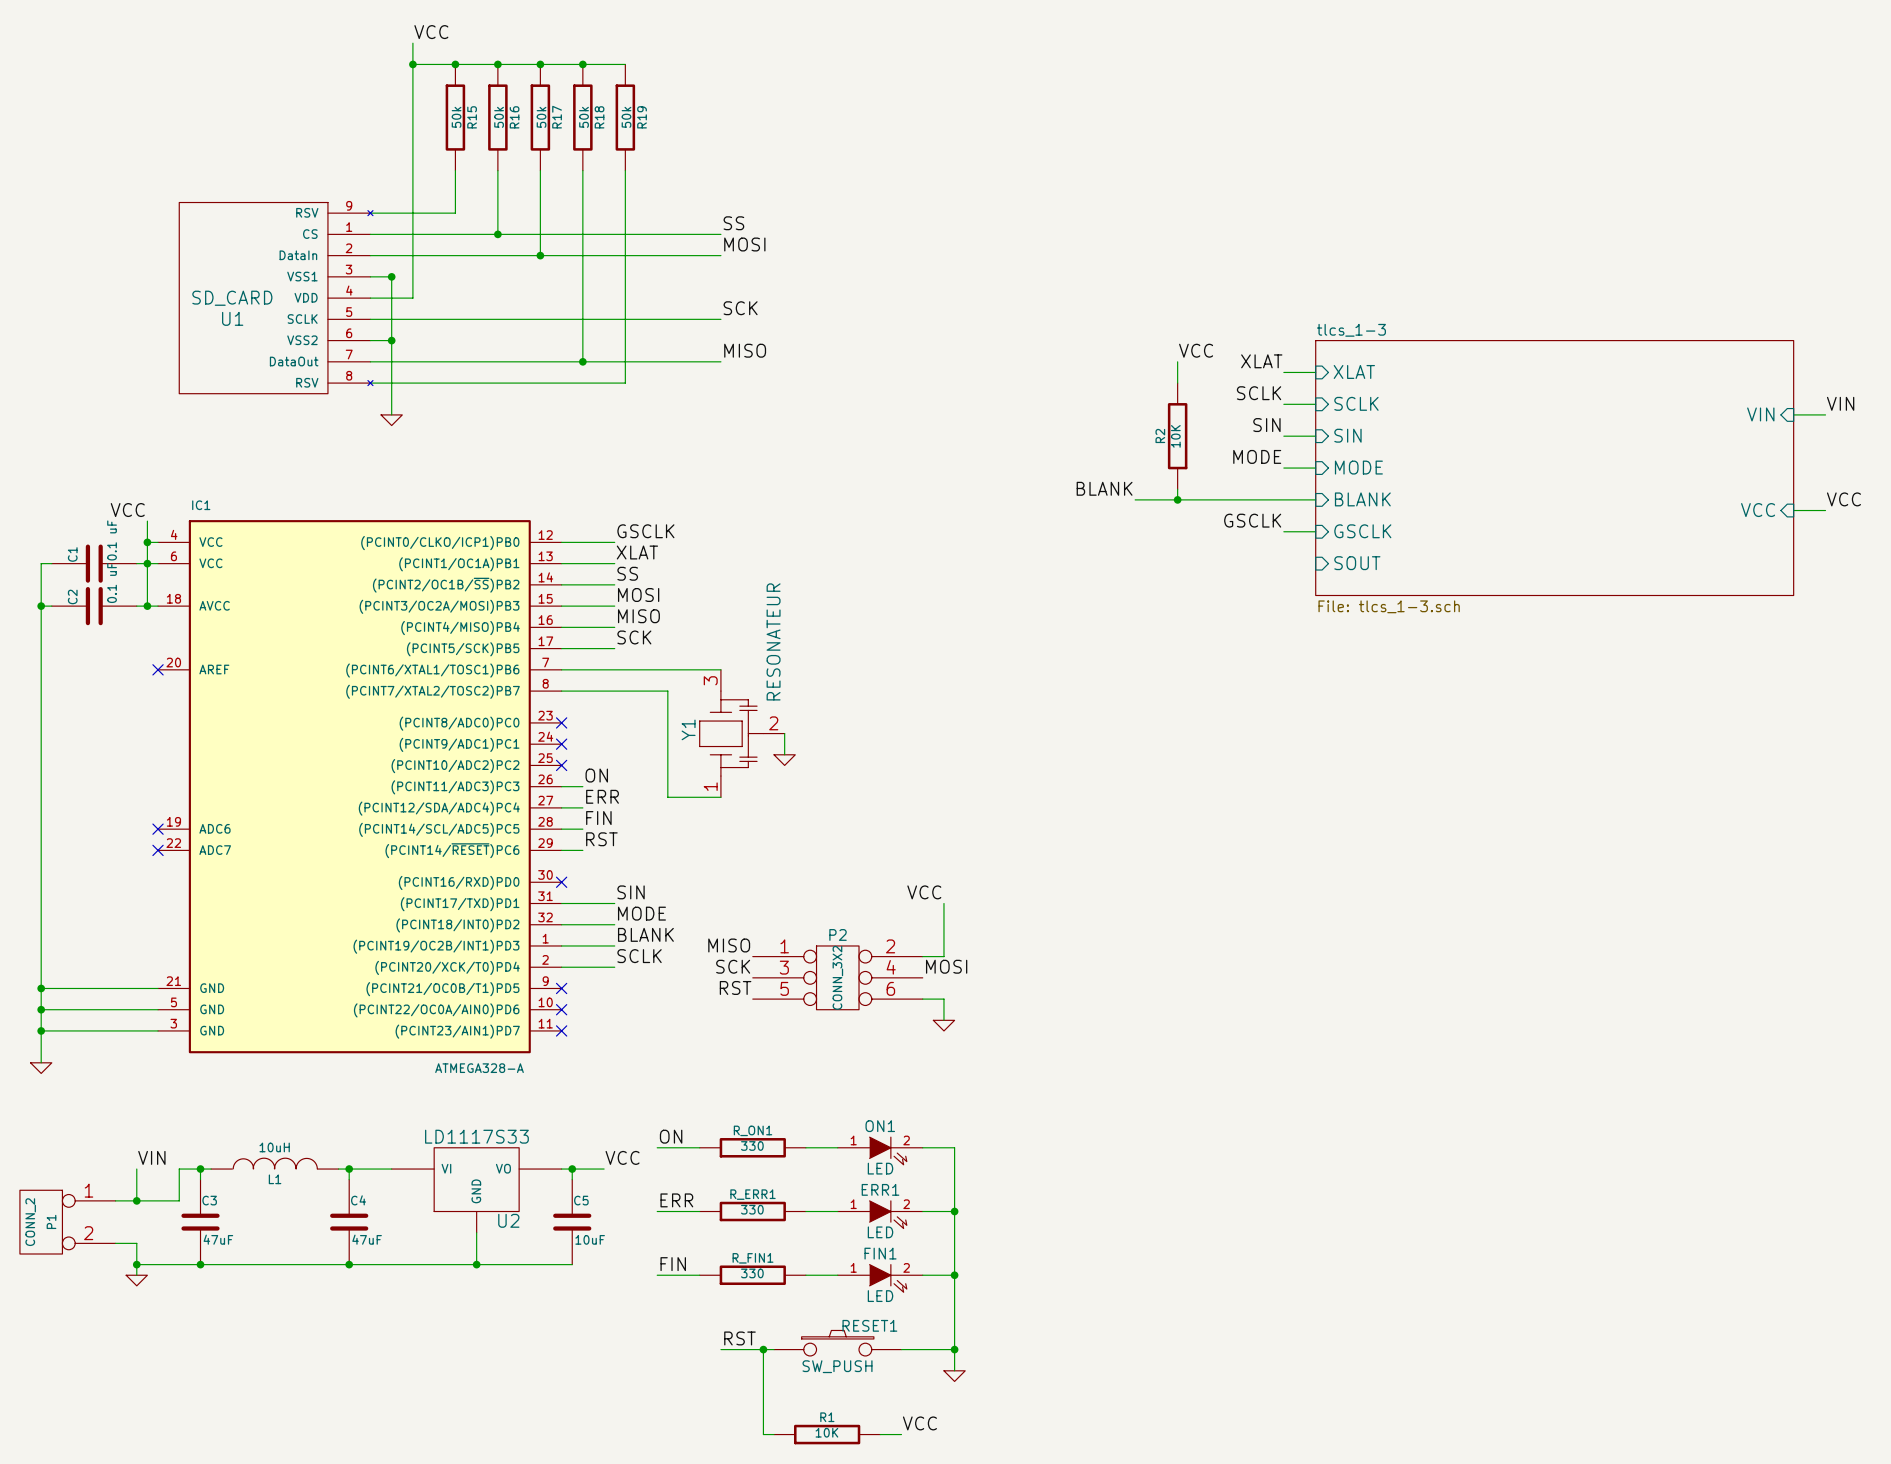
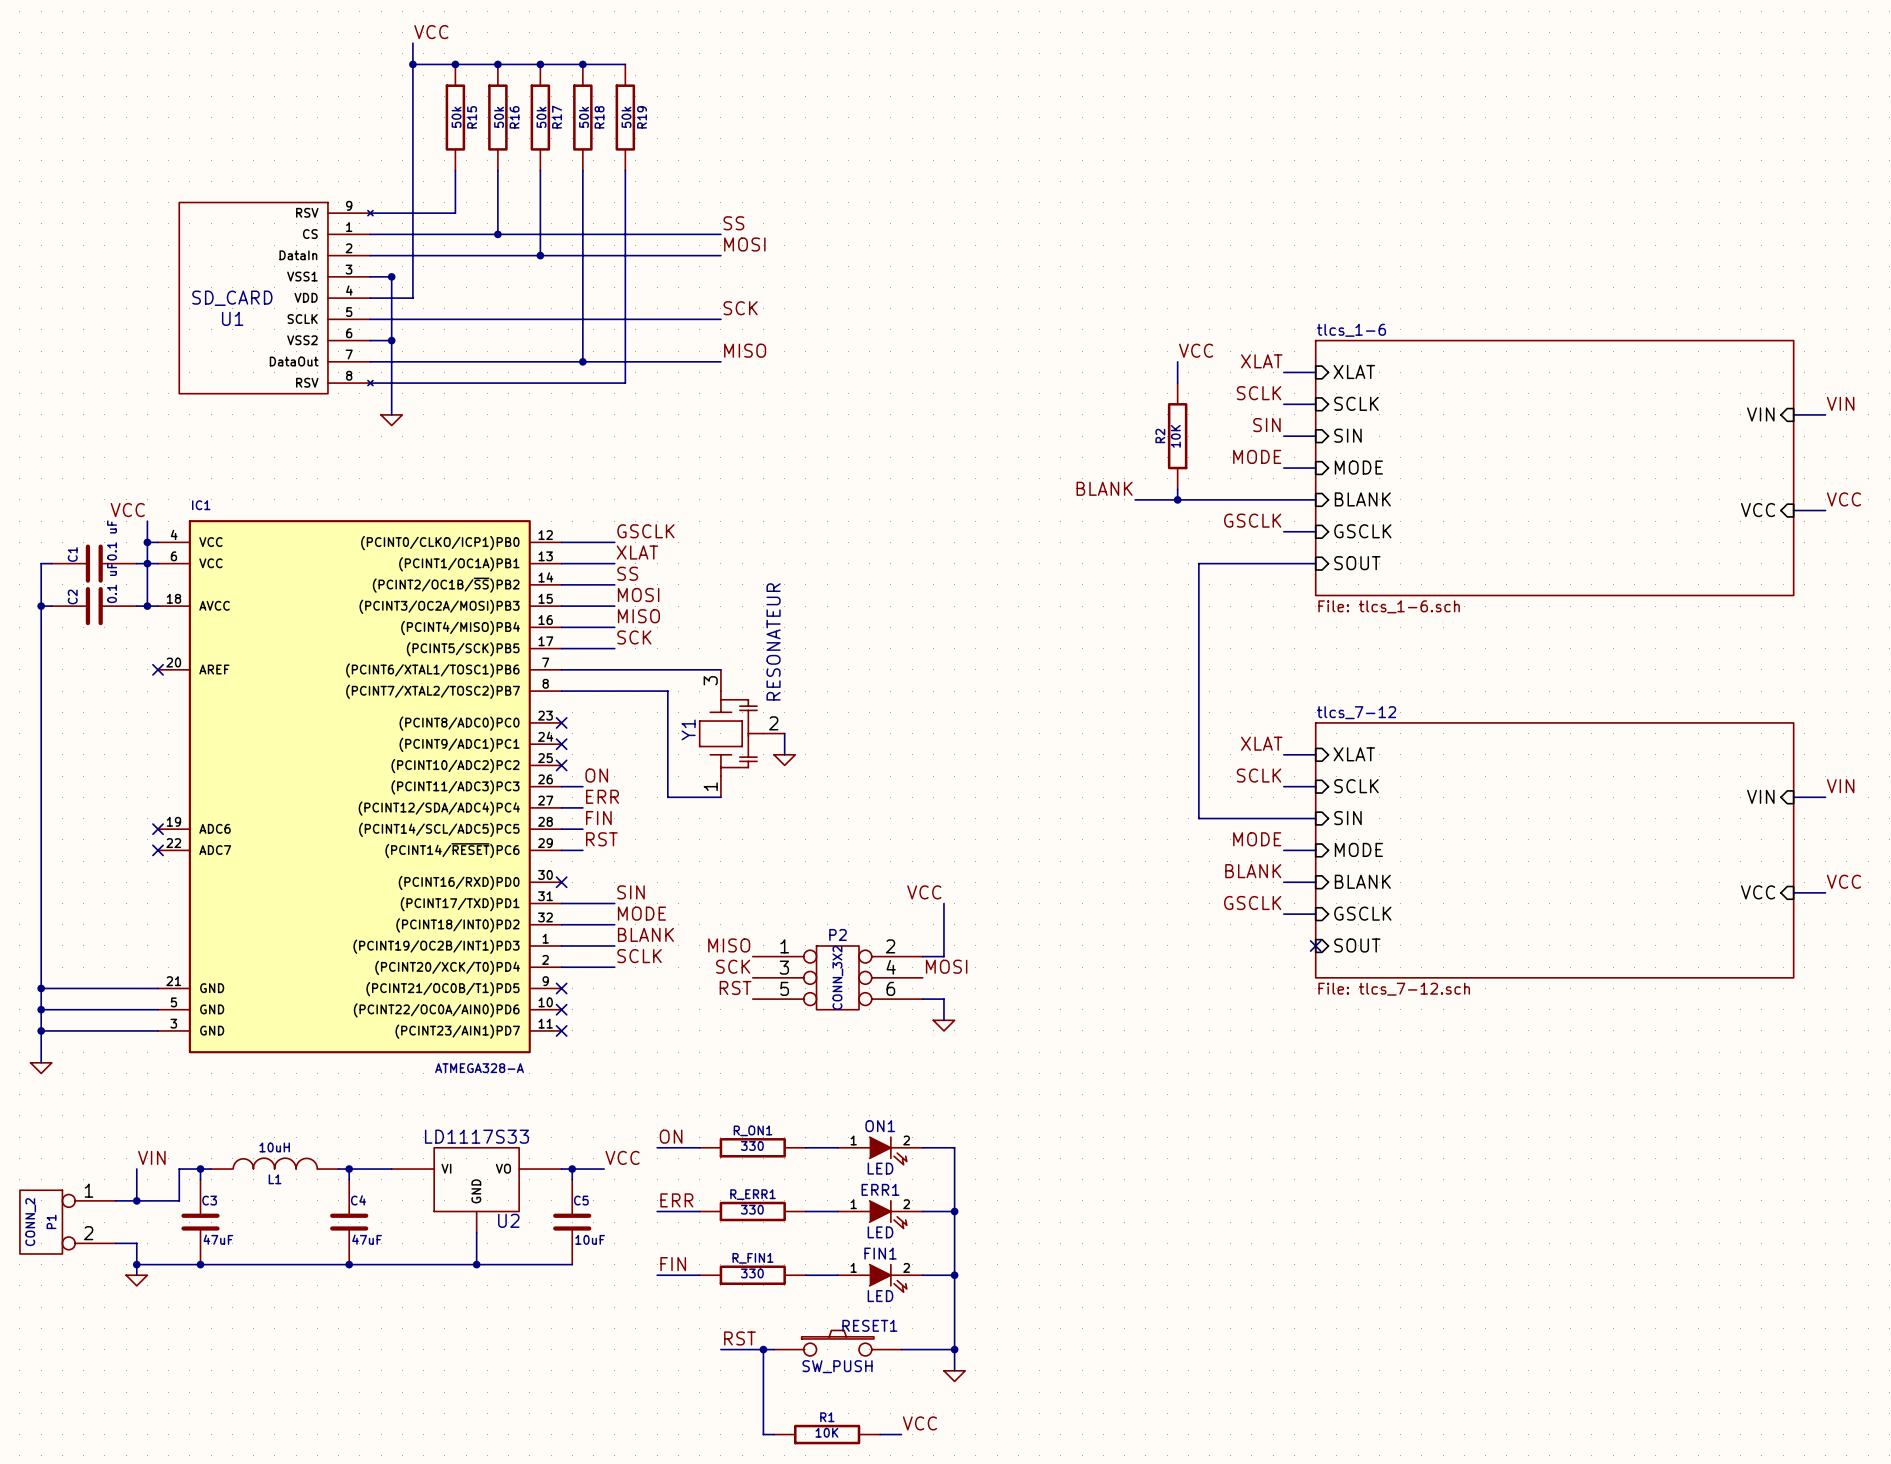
sheet tlcs_1-3 name: tlcs_1-3 (1351, 330) -> tlcs_1-6 (1351, 330)
wire: none -> (1315, 563) (1198, 563) (1198, 818) (1315, 818)
sheet tlcs_1-3 value: File: tlcs_1-3.sch (1389, 606) -> File: tlcs_1-6.sch (1389, 606)
label: none -> XLAT (1261, 743)
wire: none -> (1283, 754) (1315, 754)
sheet pin: none -> XLAT (1354, 754)
label: none -> SCLK (1259, 775)
wire: none -> (1283, 786) (1315, 786)
sheet pin: none -> SCLK (1356, 786)
label: none -> VIN (1840, 786)
sheet pin: none -> VIN (1760, 796)
wire: none -> (1793, 797) (1825, 797)
sheet pin: none -> SIN (1347, 818)
label: none -> MODE (1257, 839)
sheet pin: none -> MODE (1358, 849)
wire: none -> (1283, 850) (1315, 850)
sheet tlcs_7-12: none -> File: tlcs_7-12.sch (1554, 850)
label: none -> BLANK (1253, 871)
sheet pin: none -> BLANK (1362, 881)
label: none -> VCC (1843, 881)
wire: none -> (1283, 882) (1315, 882)
sheet pin: none -> VCC (1758, 892)
wire: none -> (1793, 892) (1825, 892)
label: none -> GSCLK (1252, 903)
sheet pin: none -> GSCLK (1362, 913)
wire: none -> (1283, 914) (1315, 914)
no-connect mark: none -> (1315, 945)
sheet pin: none -> SOUT (1357, 945)

